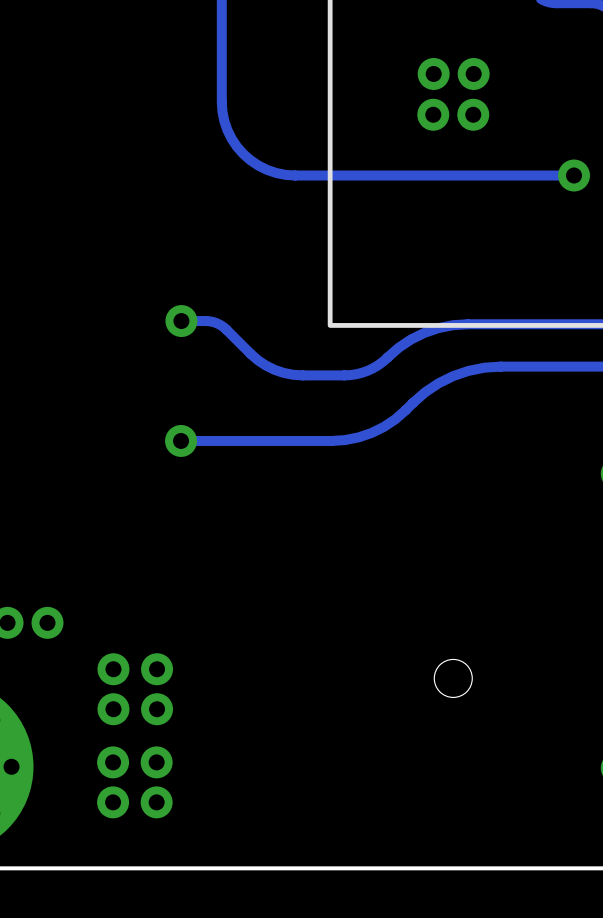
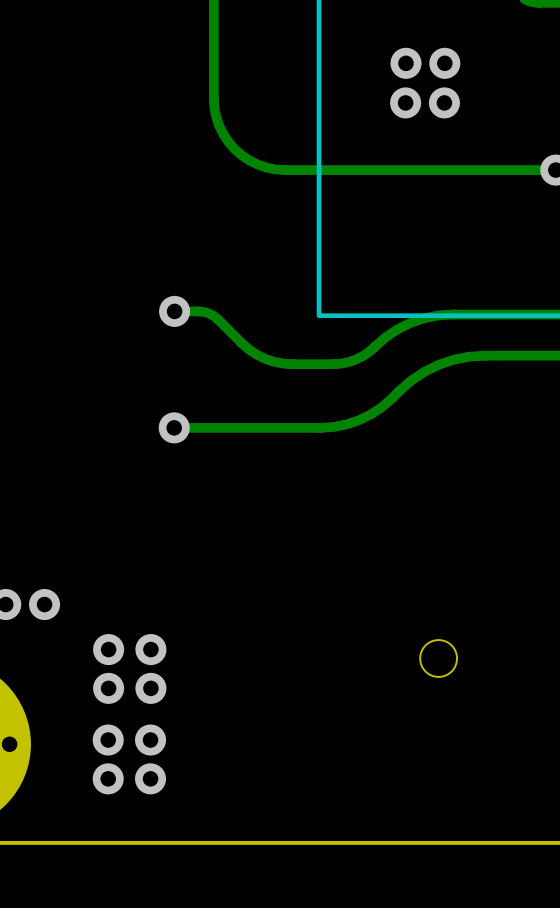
via: none -> (405, 63)
via: none -> (444, 63)
via: (433, 73) -> none
via: (473, 73) -> none
via: none -> (405, 102)
via: none -> (444, 102)
via: (433, 114) -> none
via: (473, 114) -> none

